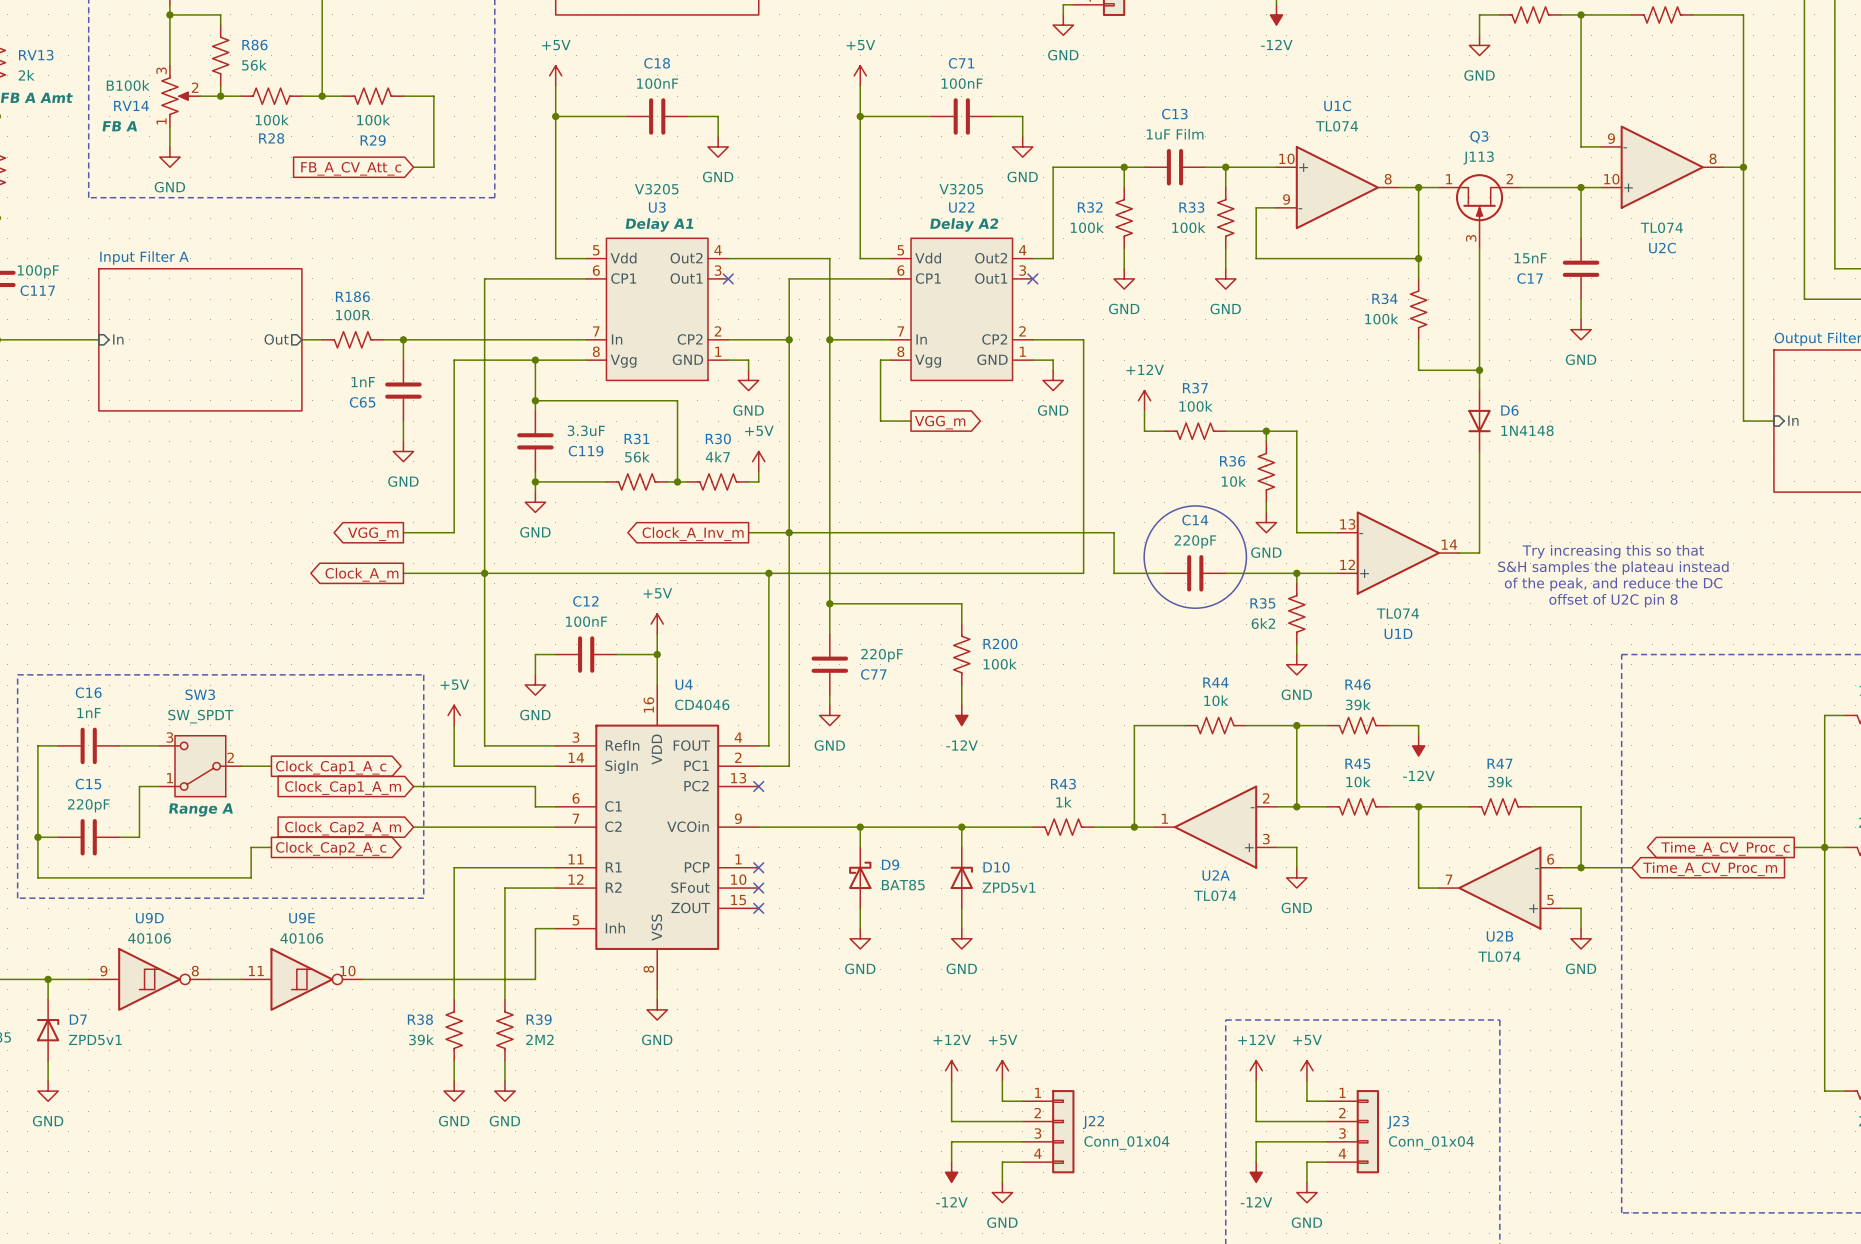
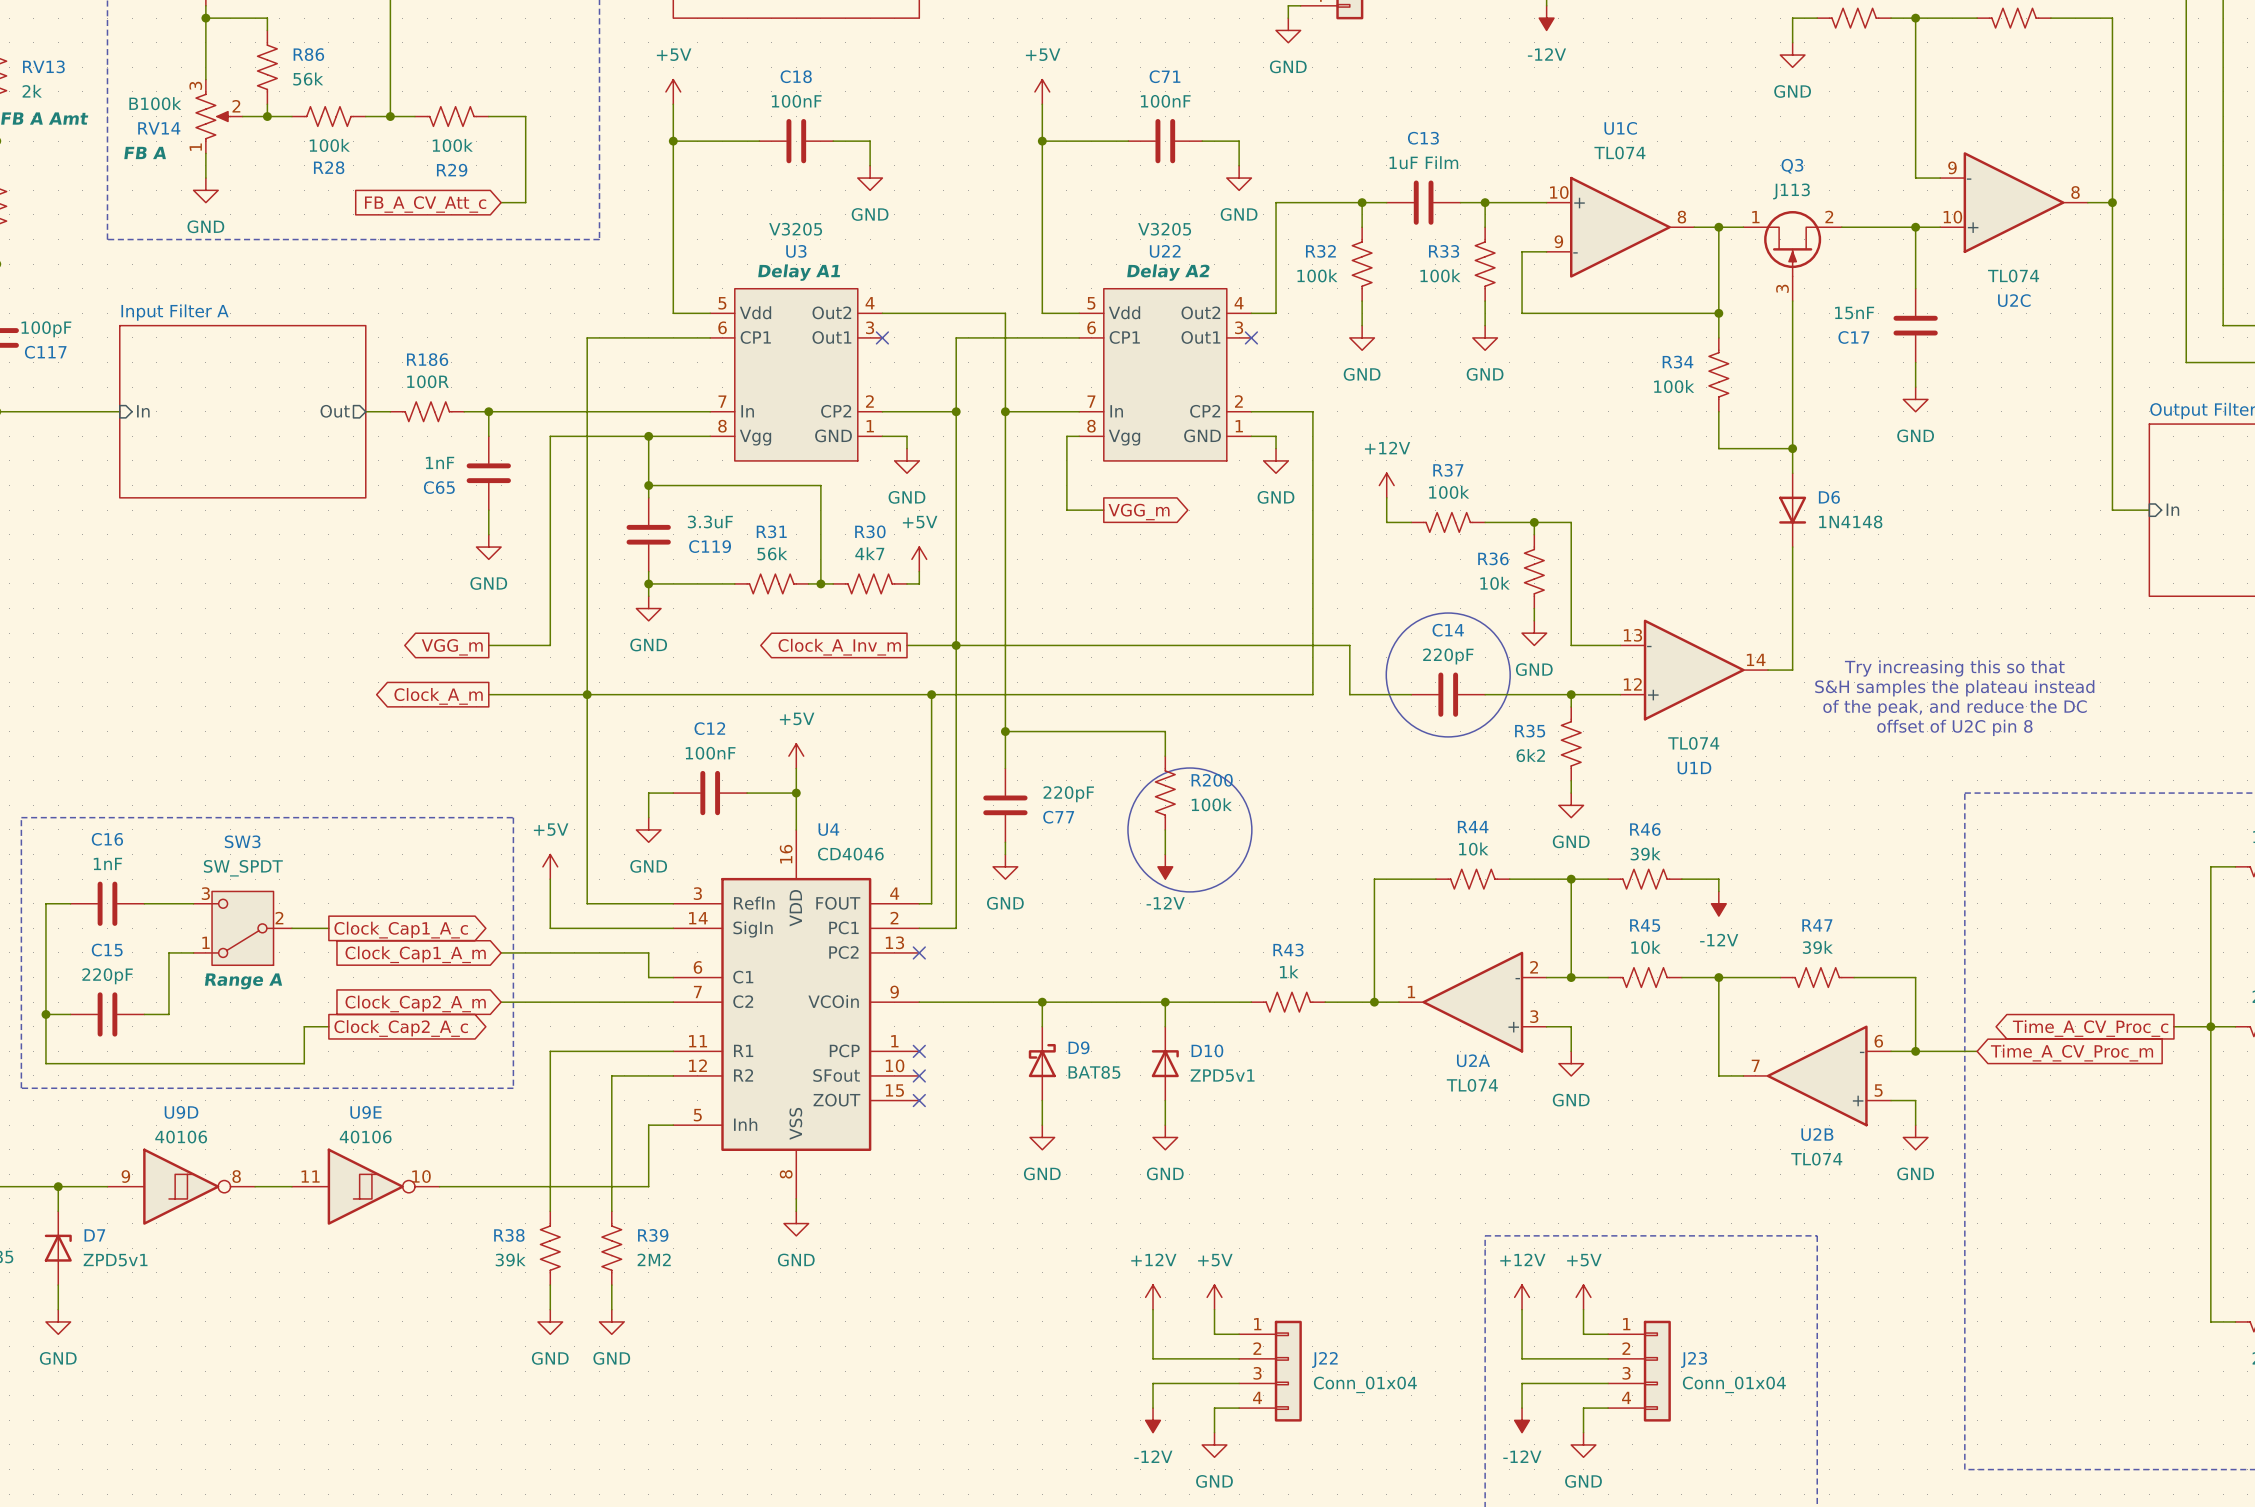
drawing: none -> [1127, 768, 1252, 892]

